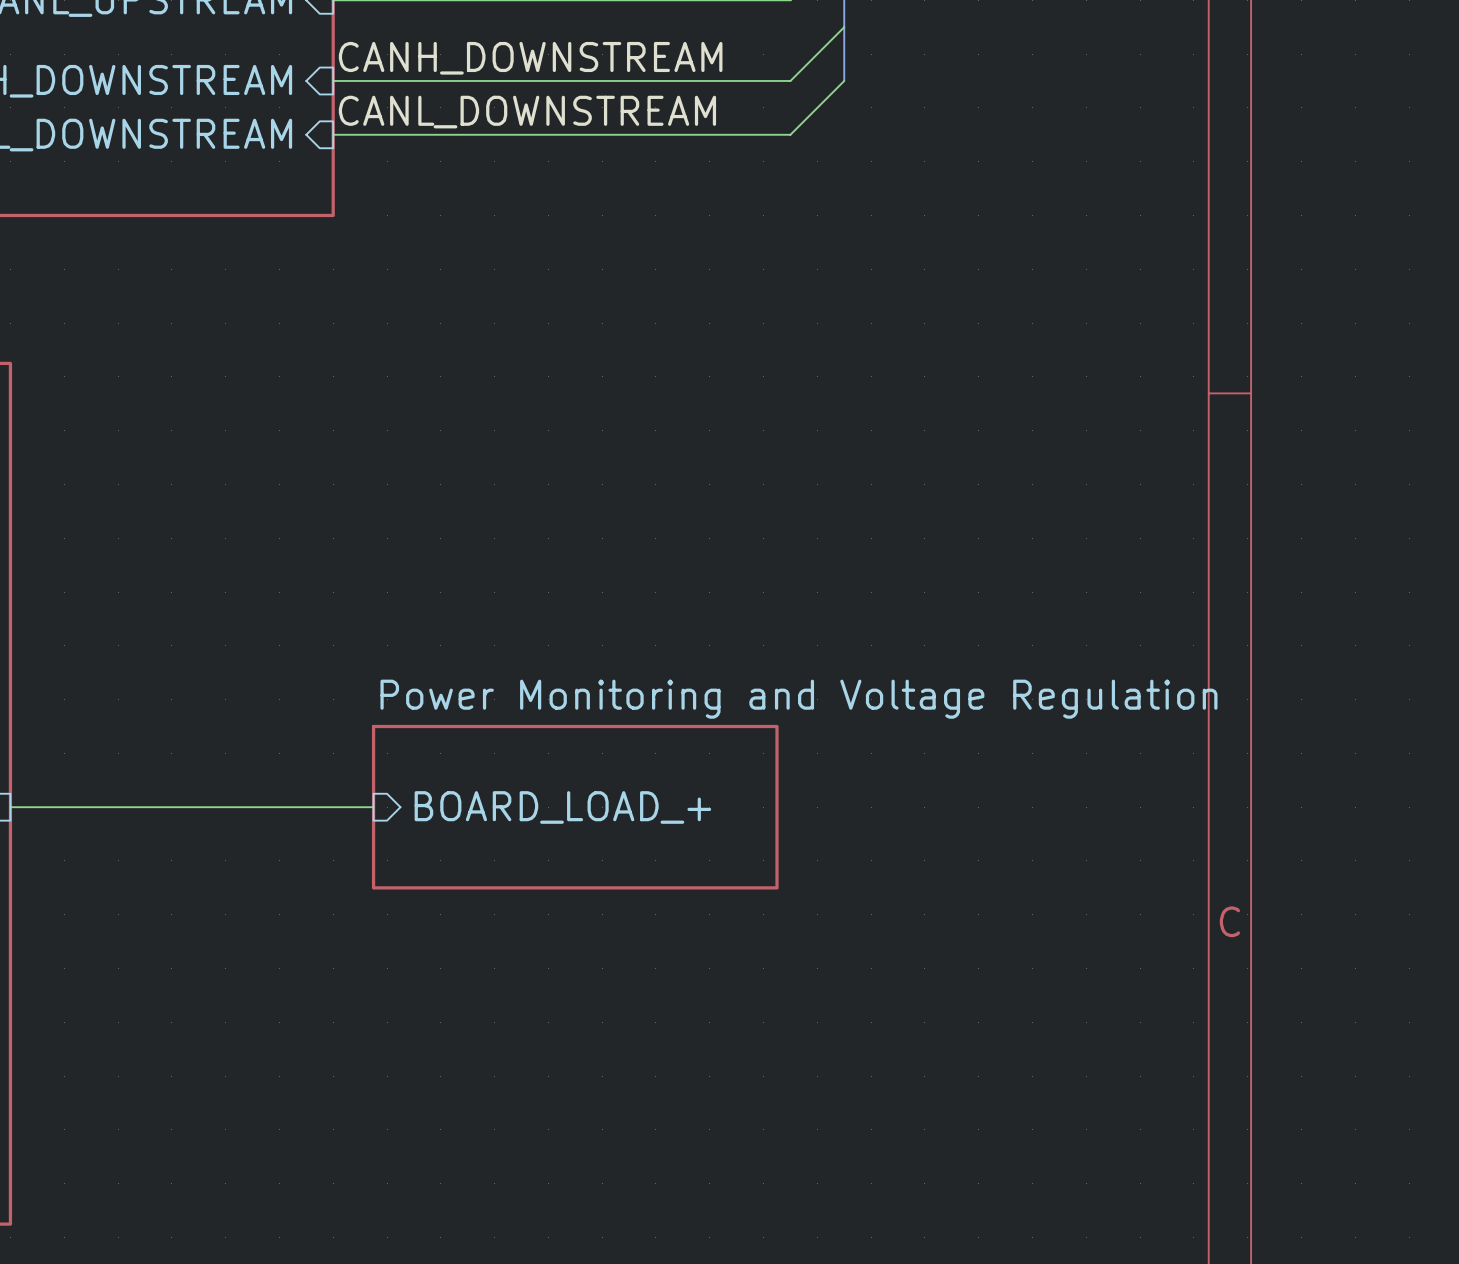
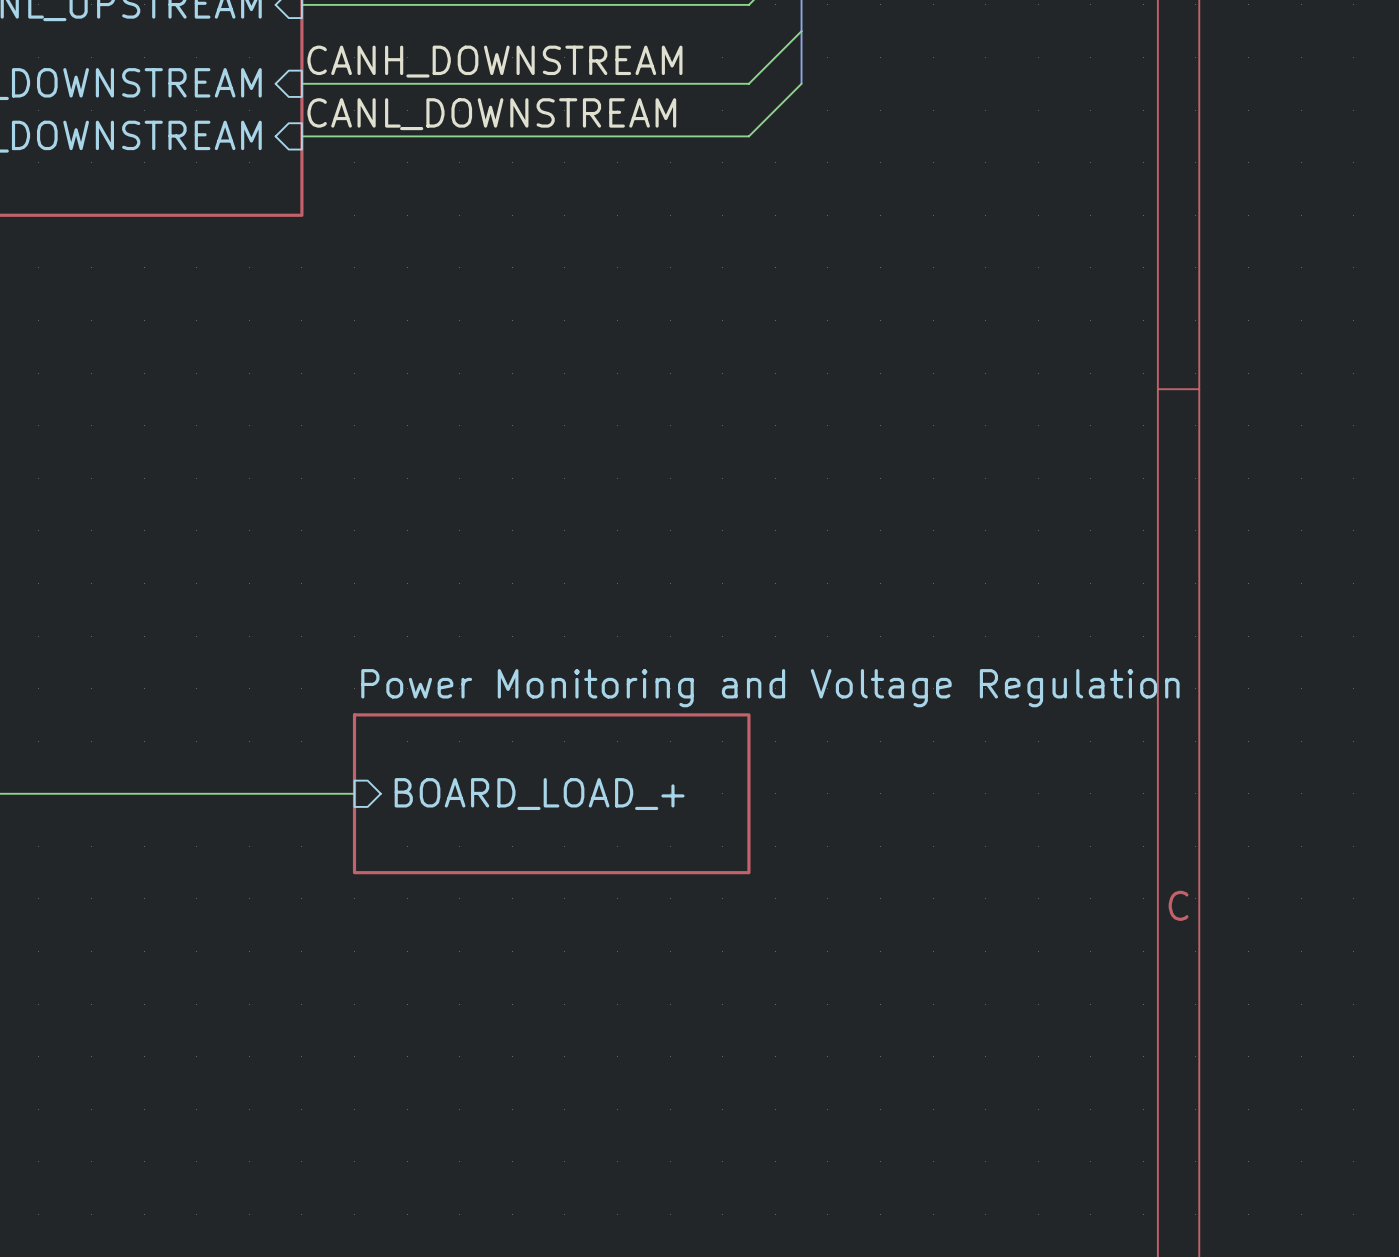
wire: none -> (341, 793) (354, 793)
sheet pin position: BOARD_LOAD_+ (562, 807) -> BOARD_LOAD_+ (539, 794)
sheet Power Monitoring and Voltage Regulation position: (575, 807) -> (551, 793)

